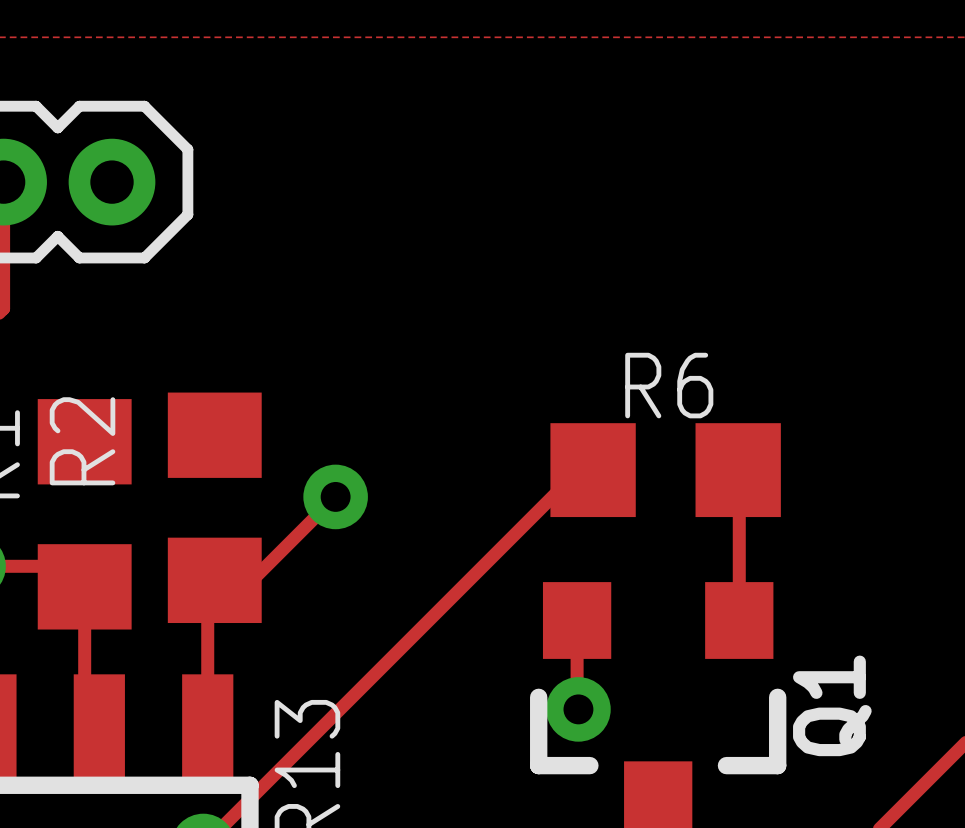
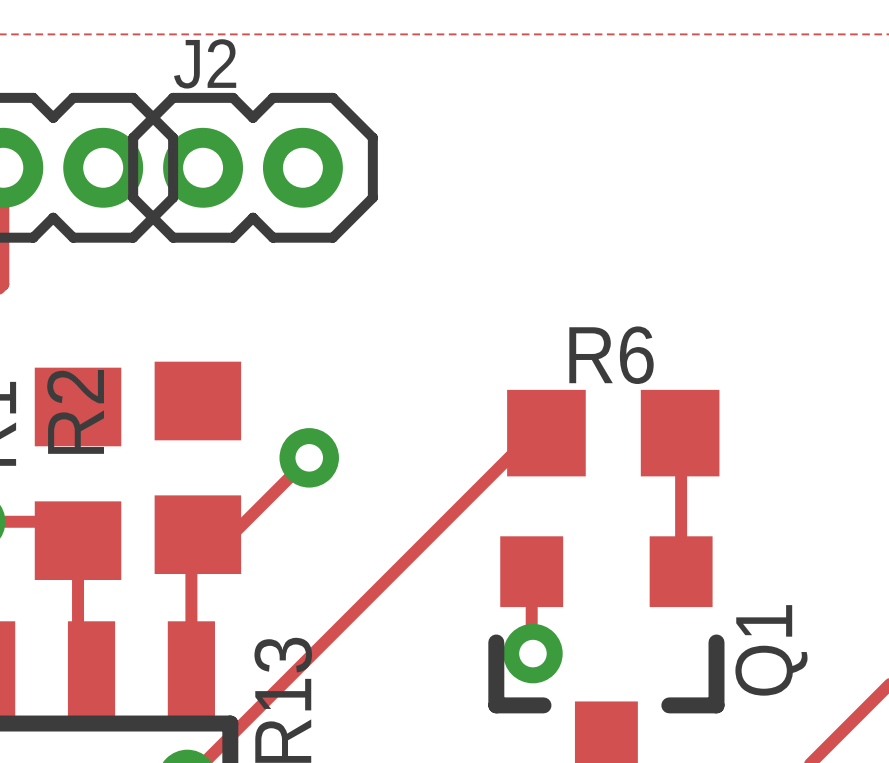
J2: none -> (253, 167)

